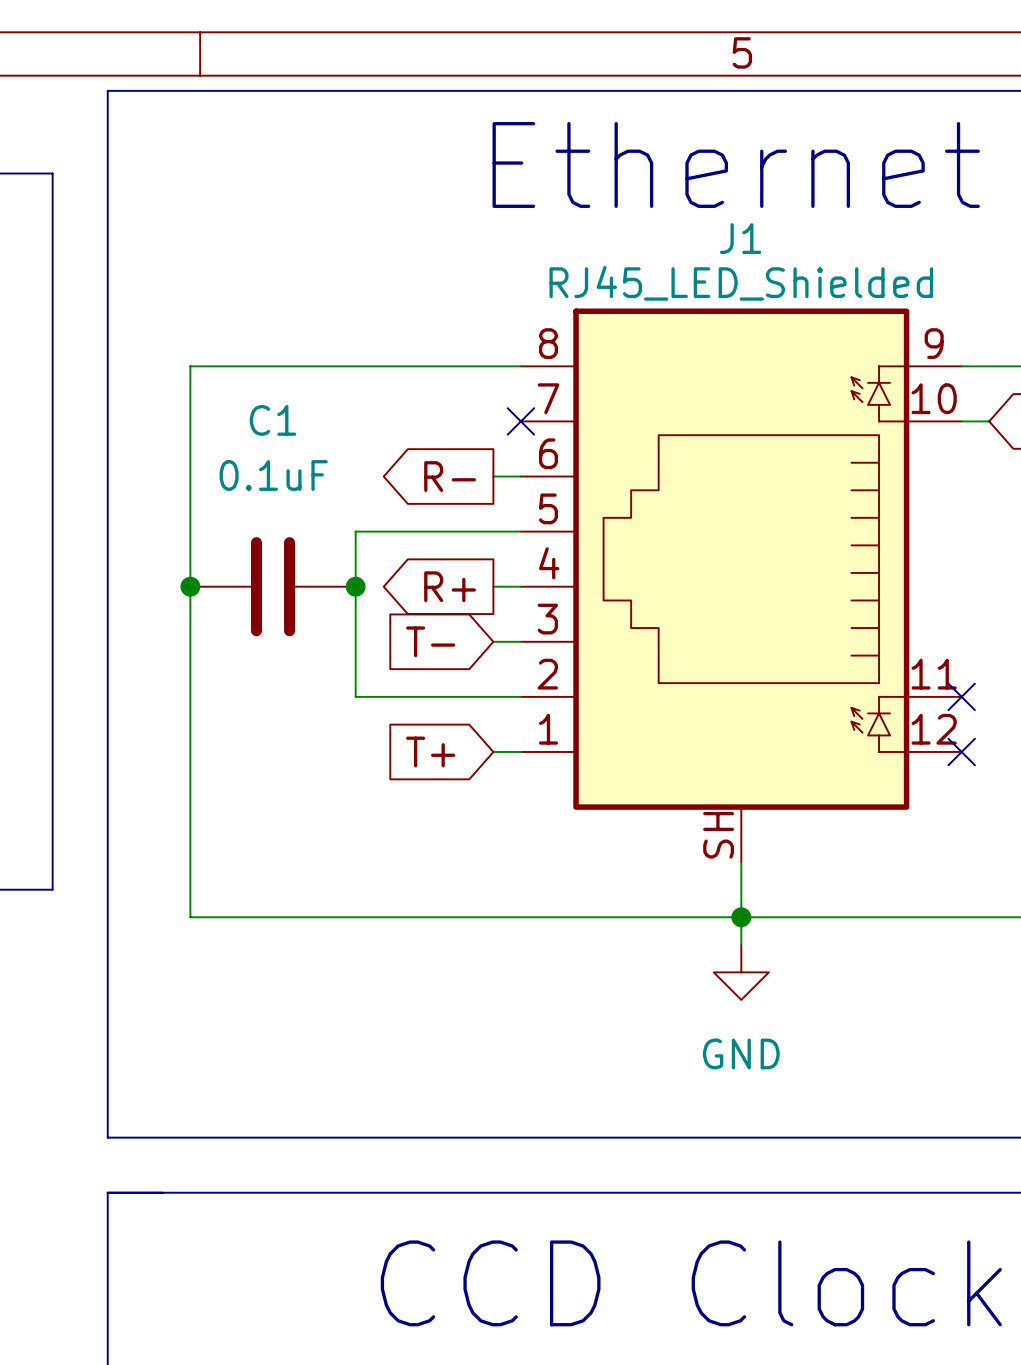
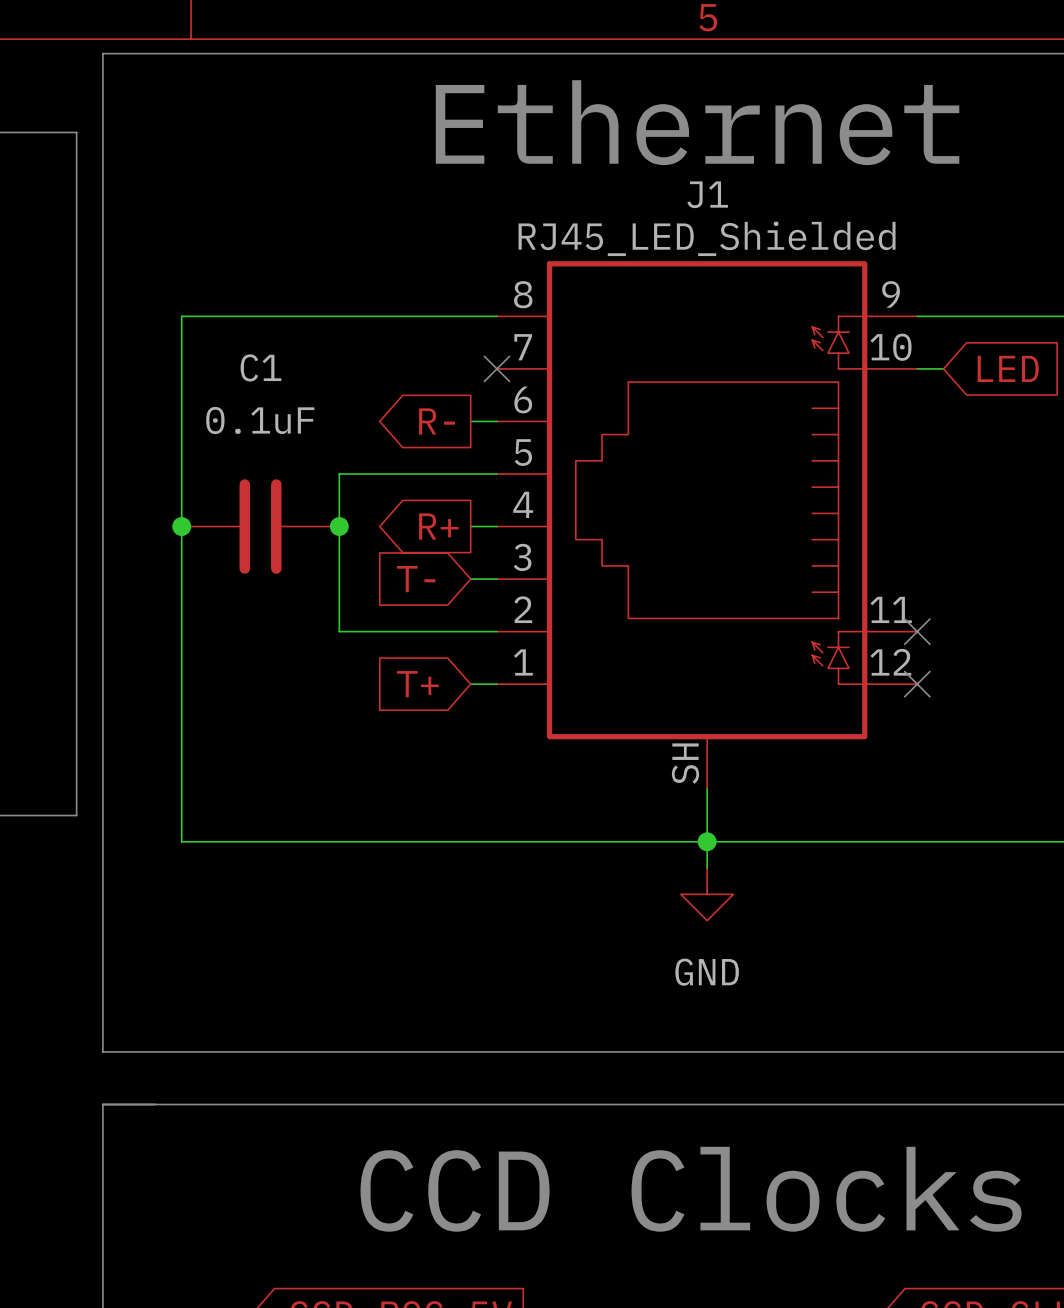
line: (52, 173) (52, 889) -> (50, 132) (76, 132) (76, 815) (50, 815)

